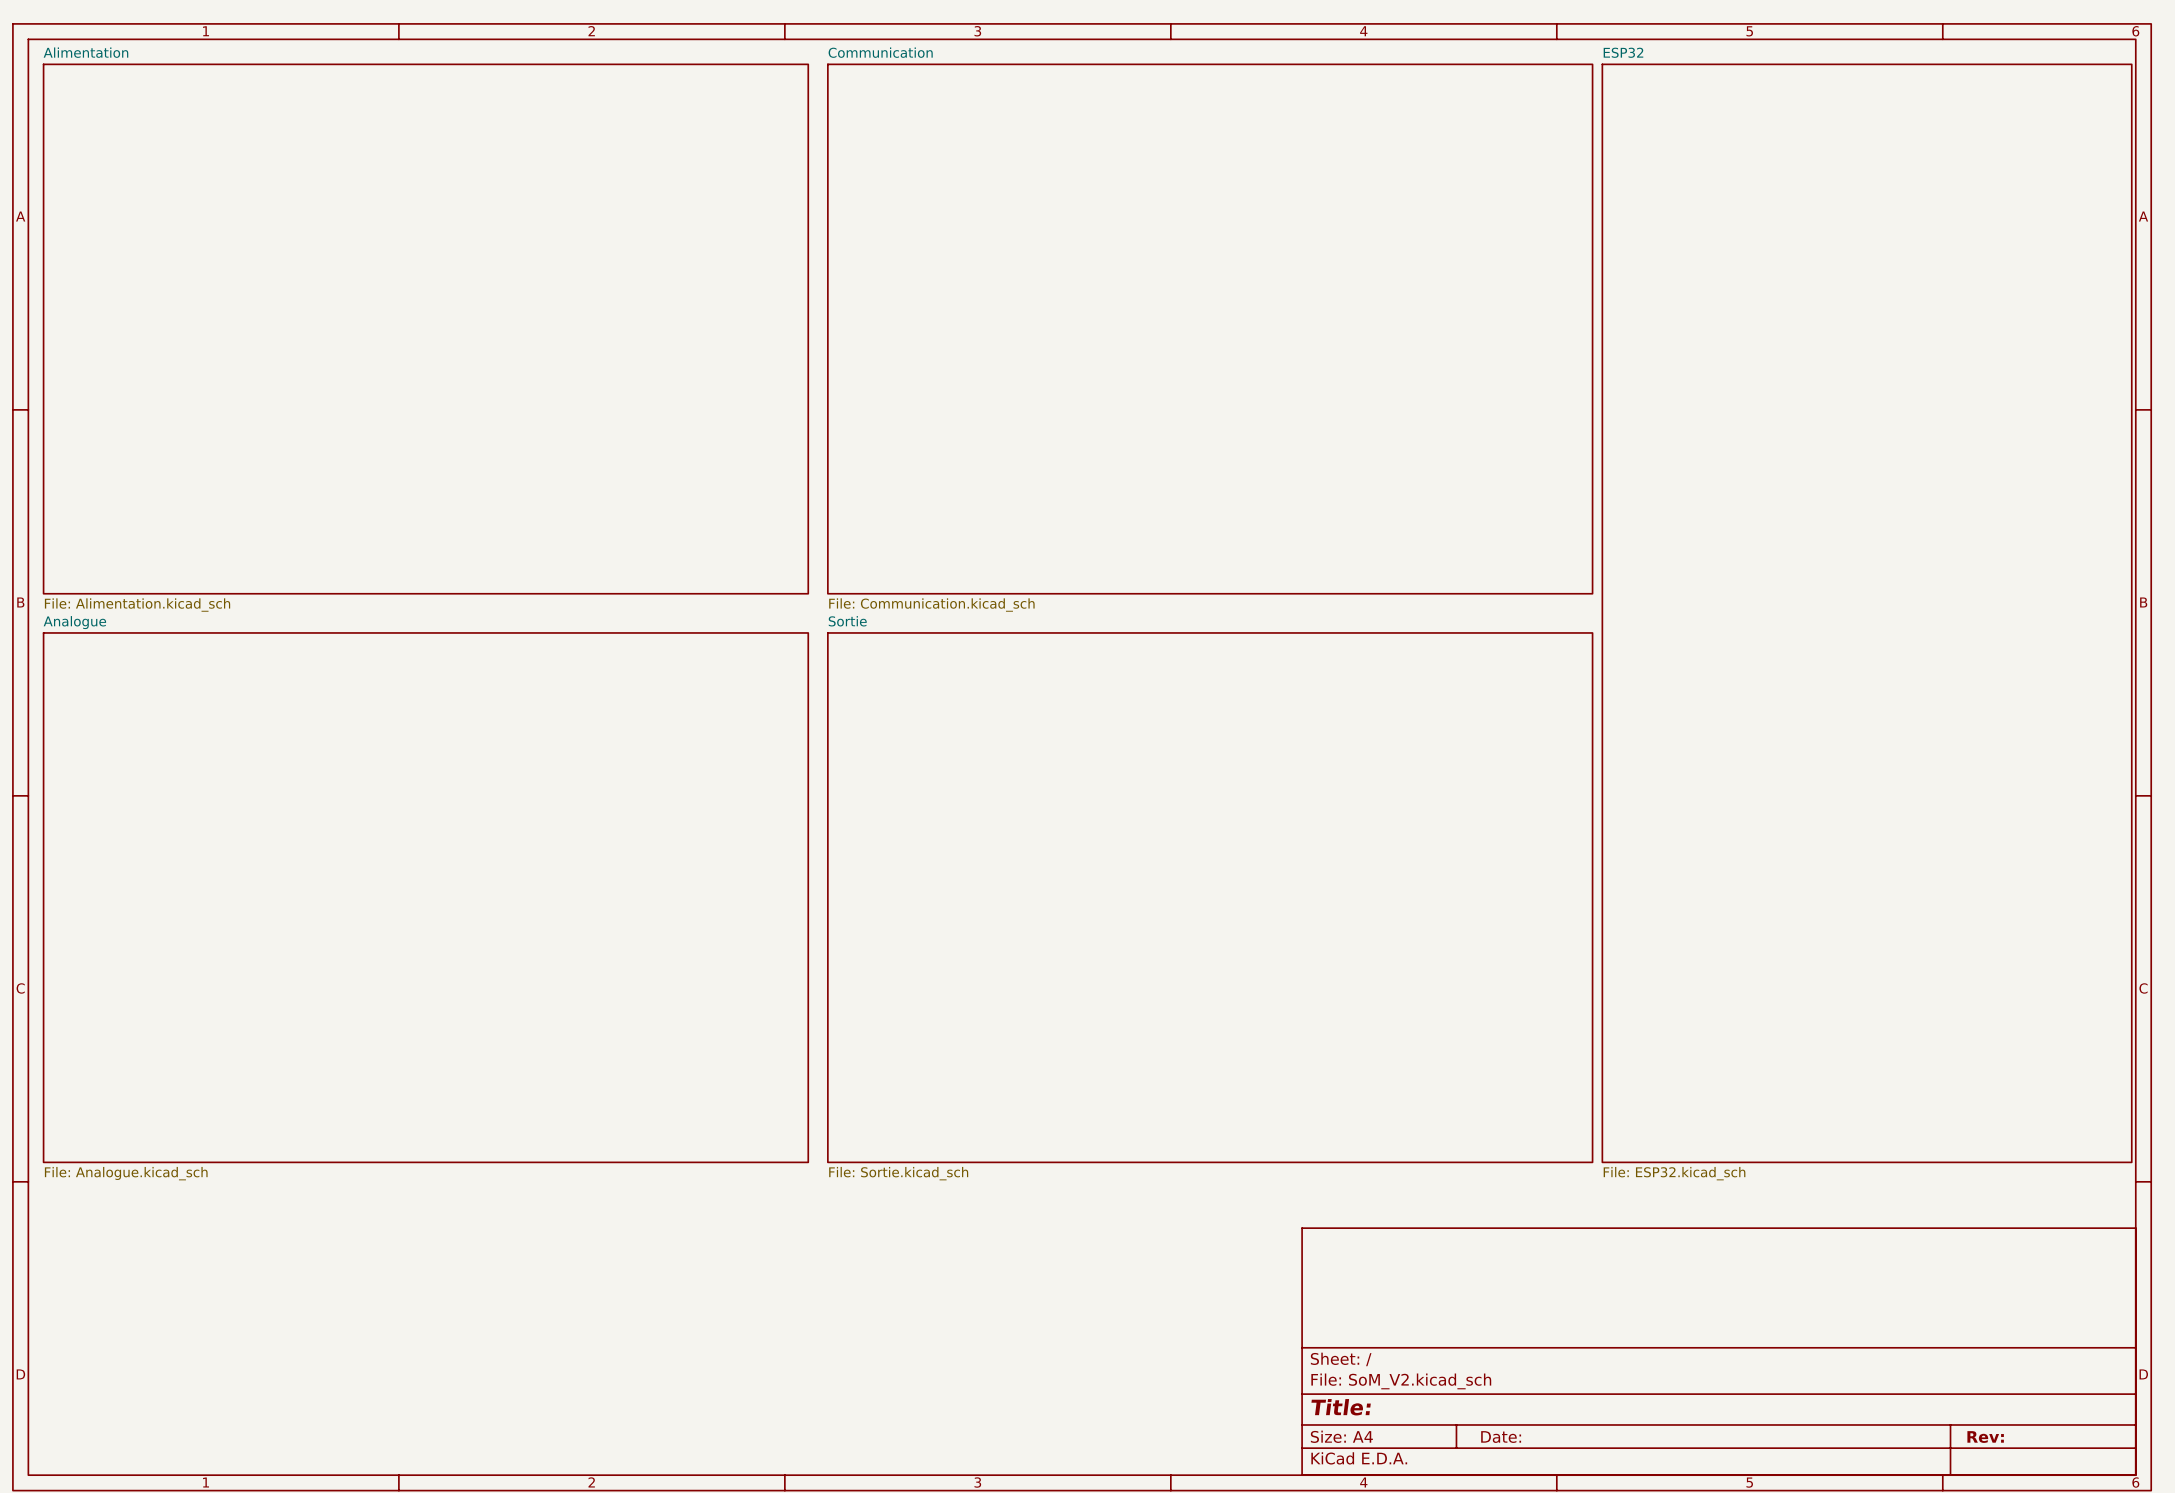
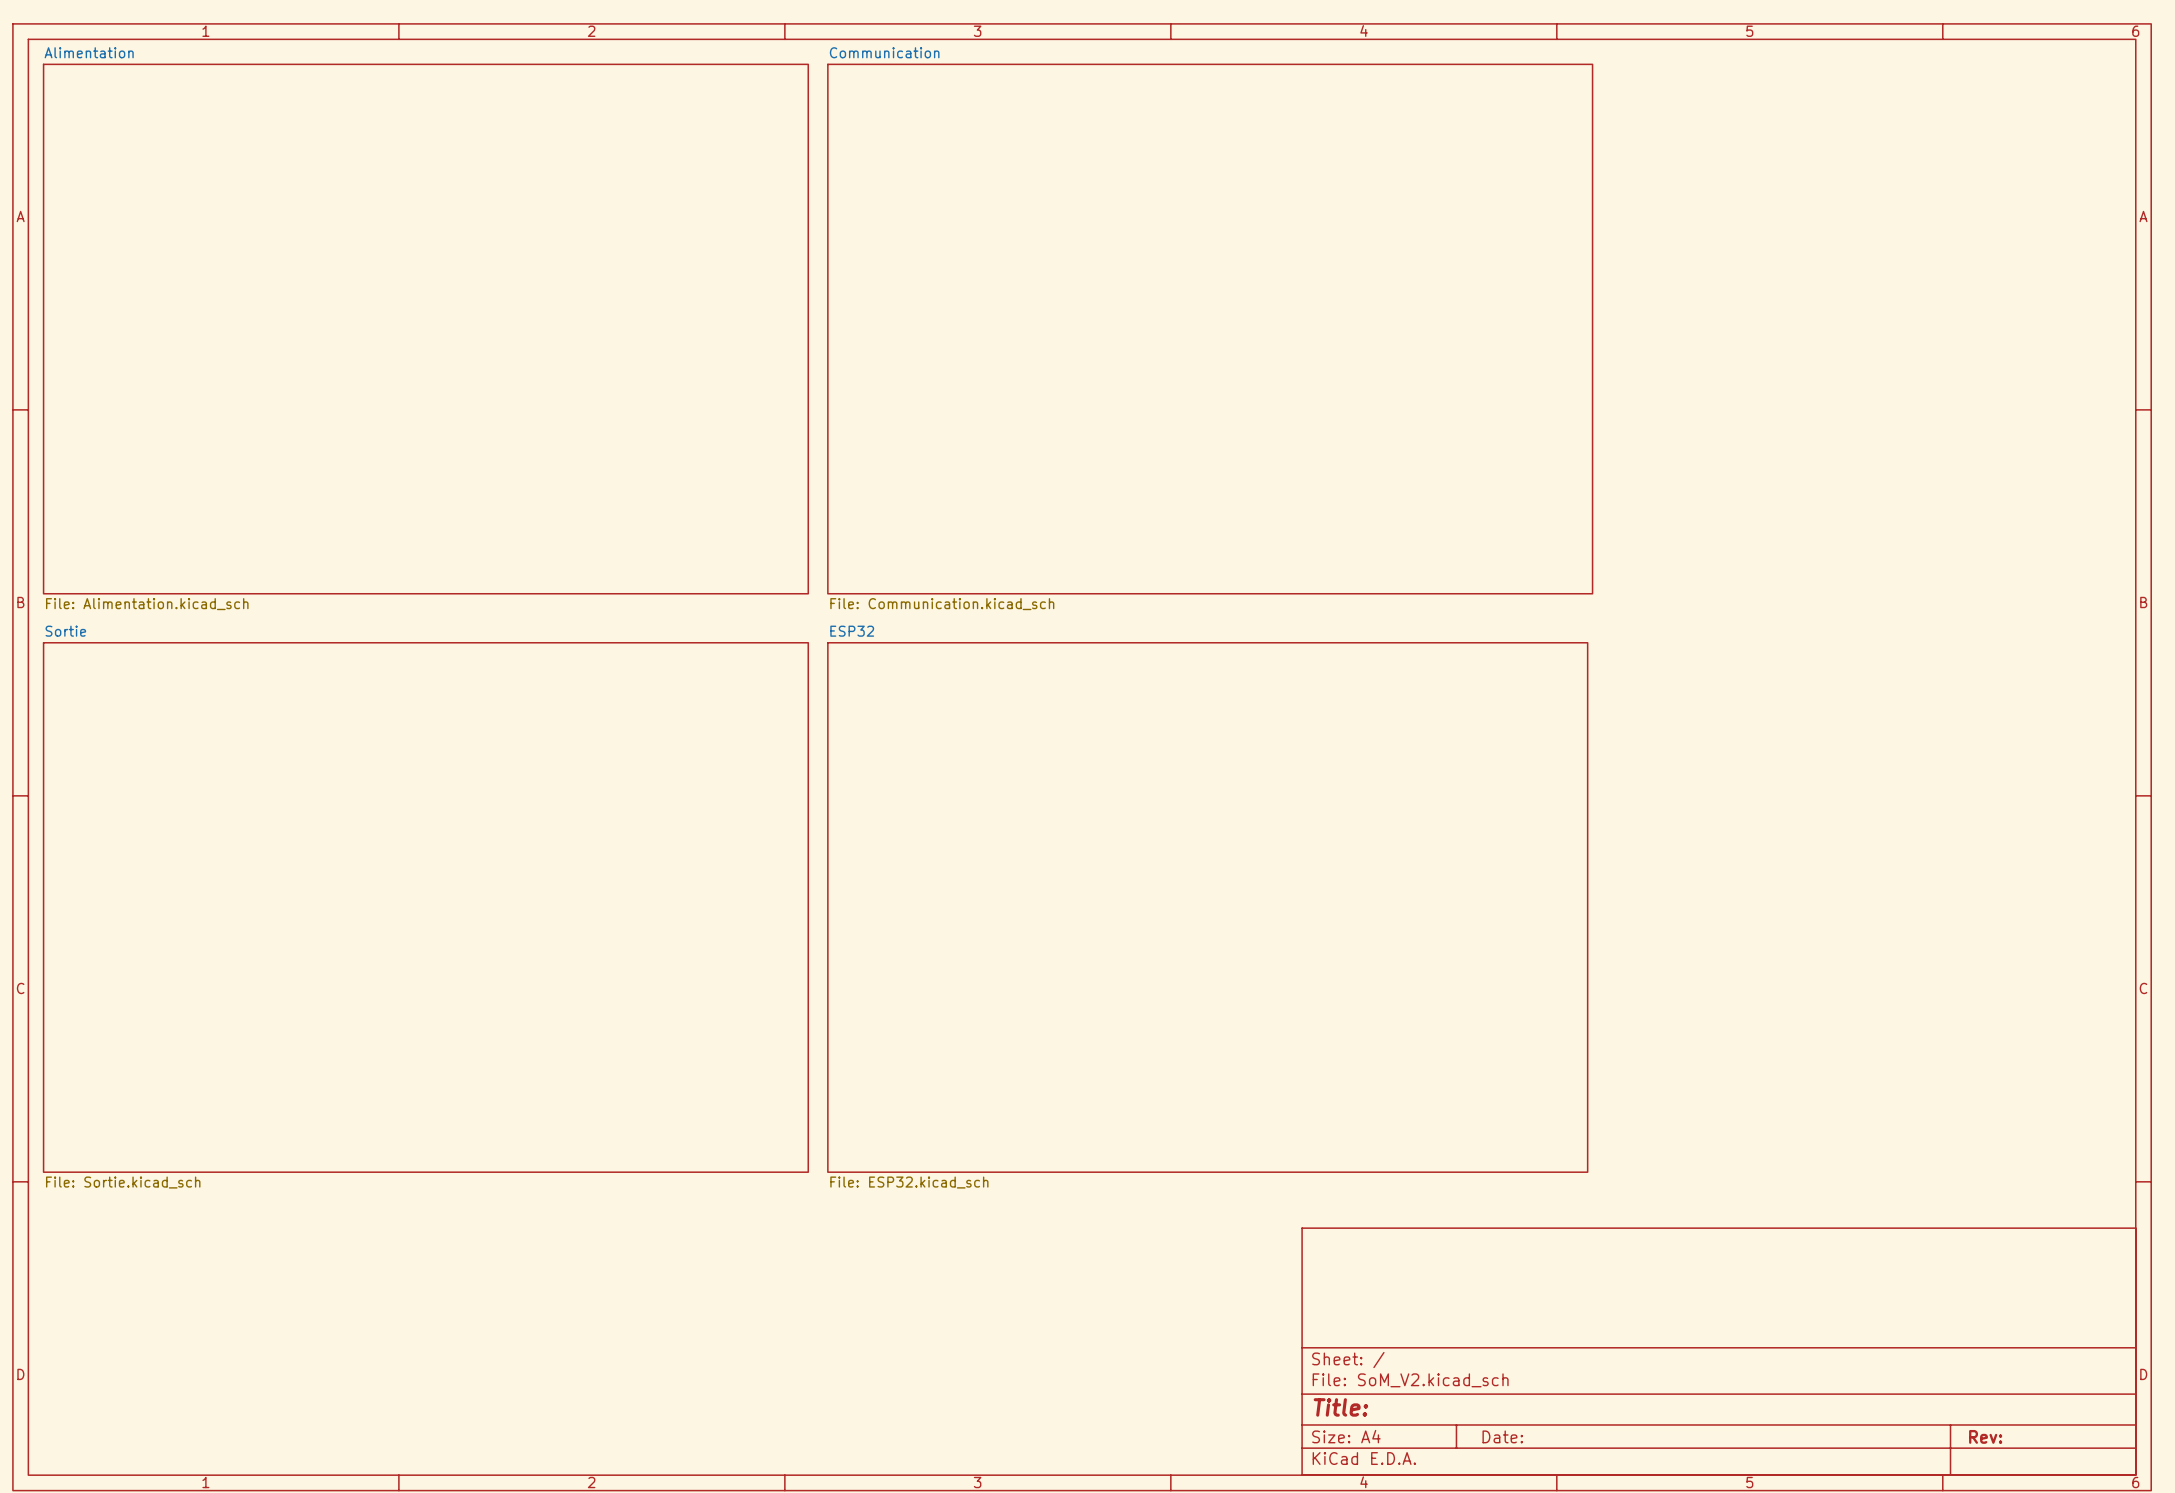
sheet ESP32 name position: ESP32 (1623, 52) -> ESP32 (852, 631)
sheet ESP32 shape: [1601, 63, 2133, 1163] -> [827, 642, 1589, 1173]
sheet Analogue: File: Analogue.kicad_sch (425, 897) -> none
sheet Sortie: File: Sortie.kicad_sch (1210, 897) -> none
sheet Sortie: none -> File: Sortie.kicad_sch (425, 907)
sheet ESP32 value position: File: ESP32.kicad_sch (1674, 1173) -> File: ESP32.kicad_sch (909, 1182)

